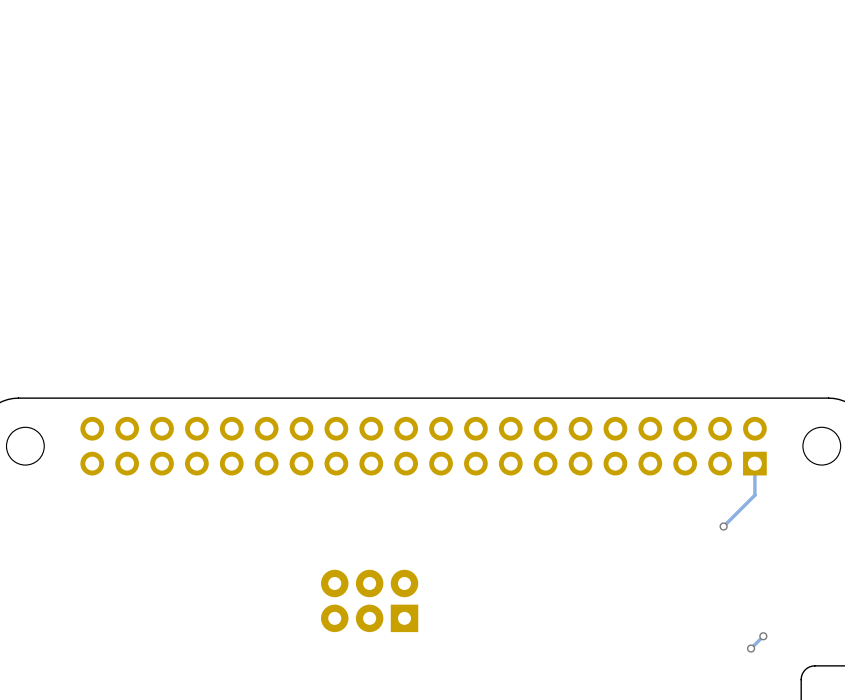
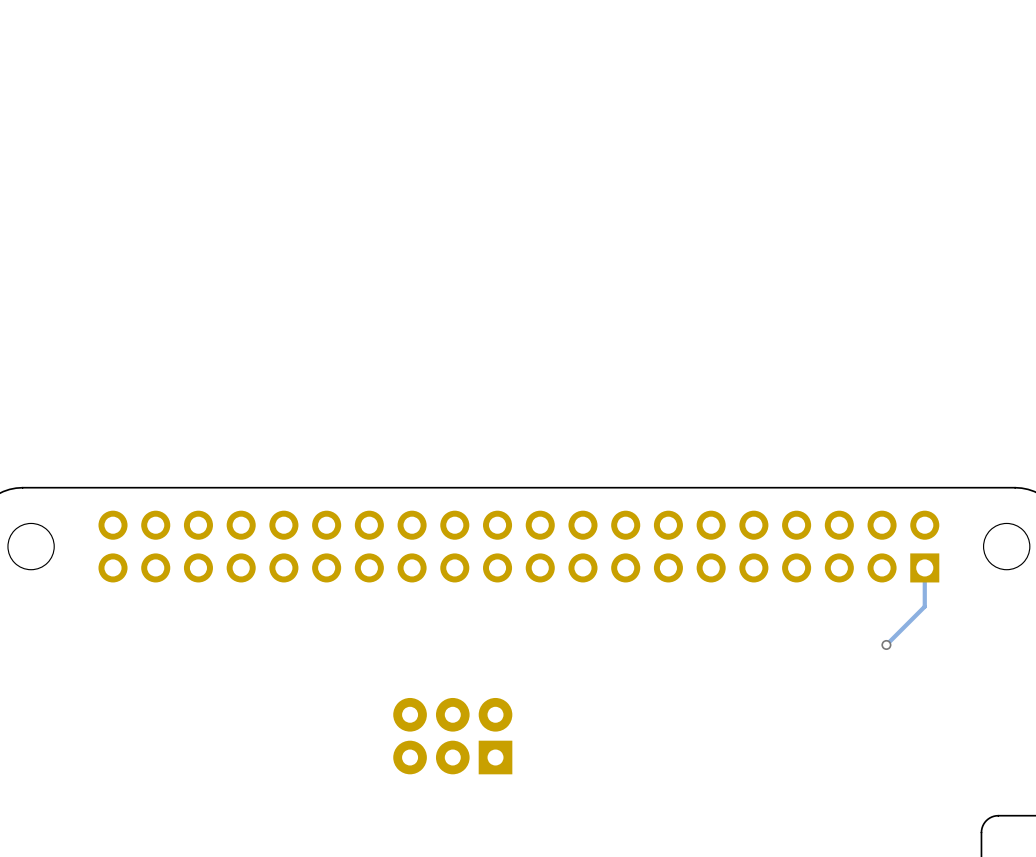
track: (763, 636) (751, 648) -> none
via: (763, 636) -> none
via: (751, 648) -> none

